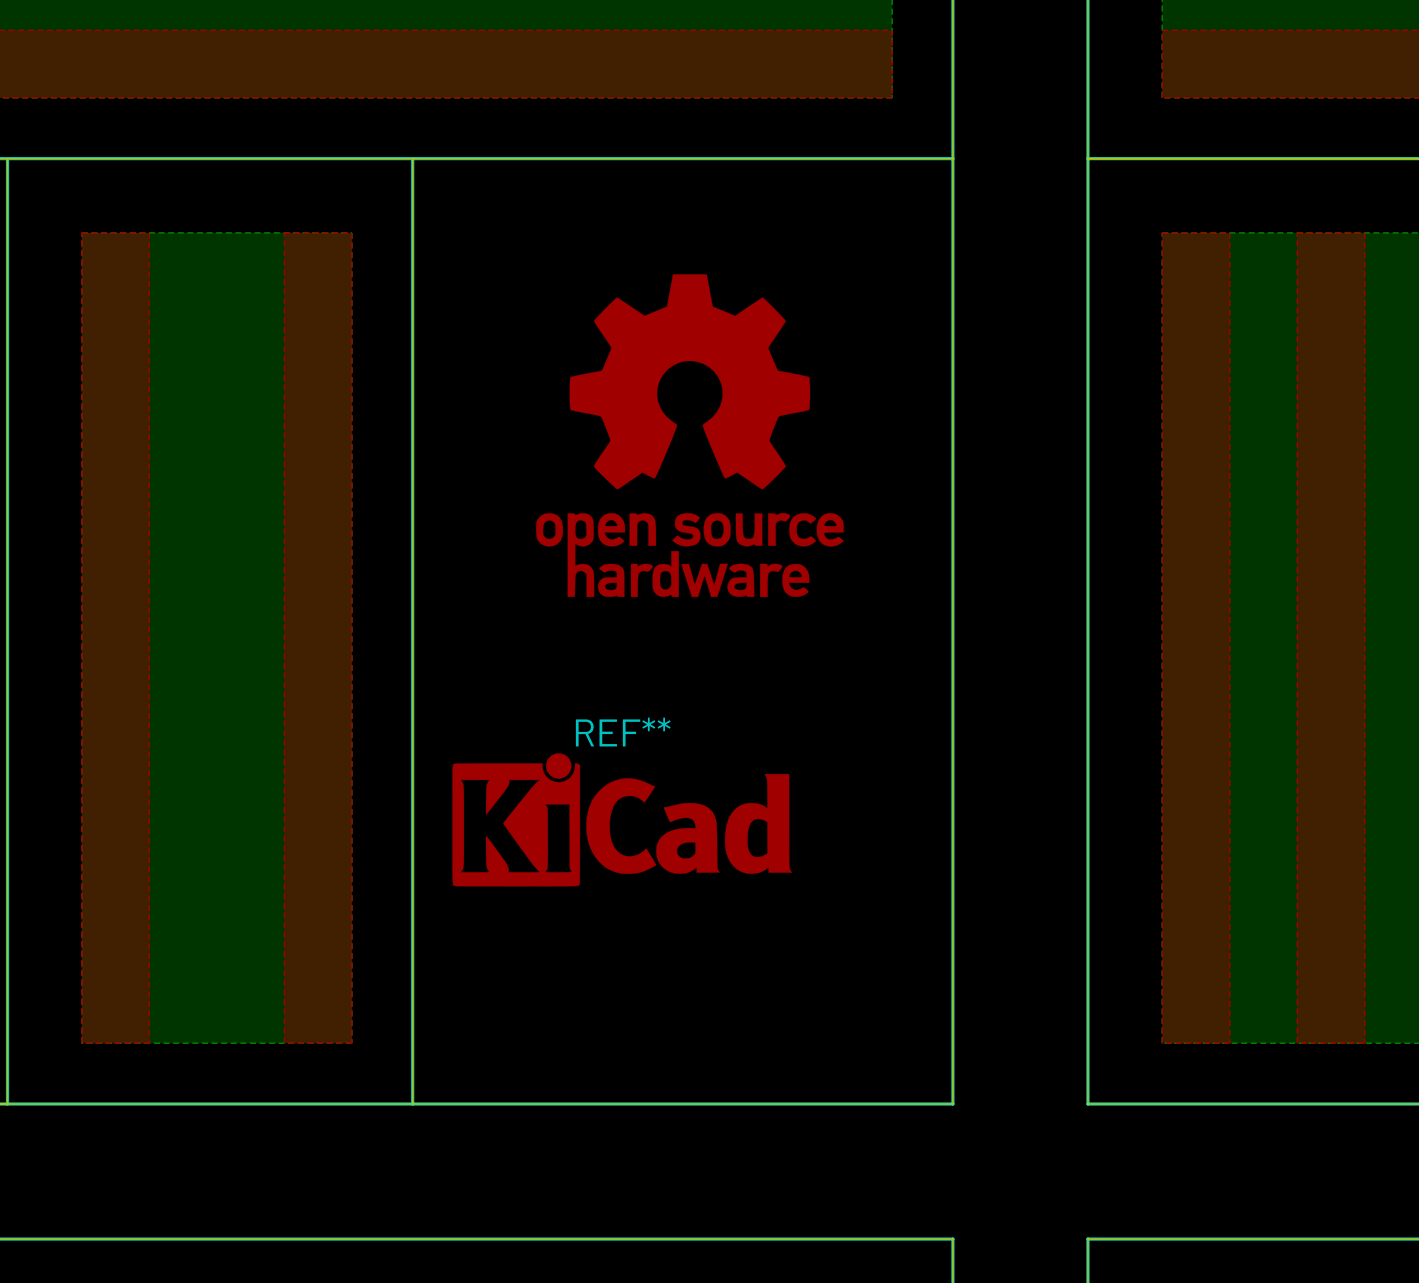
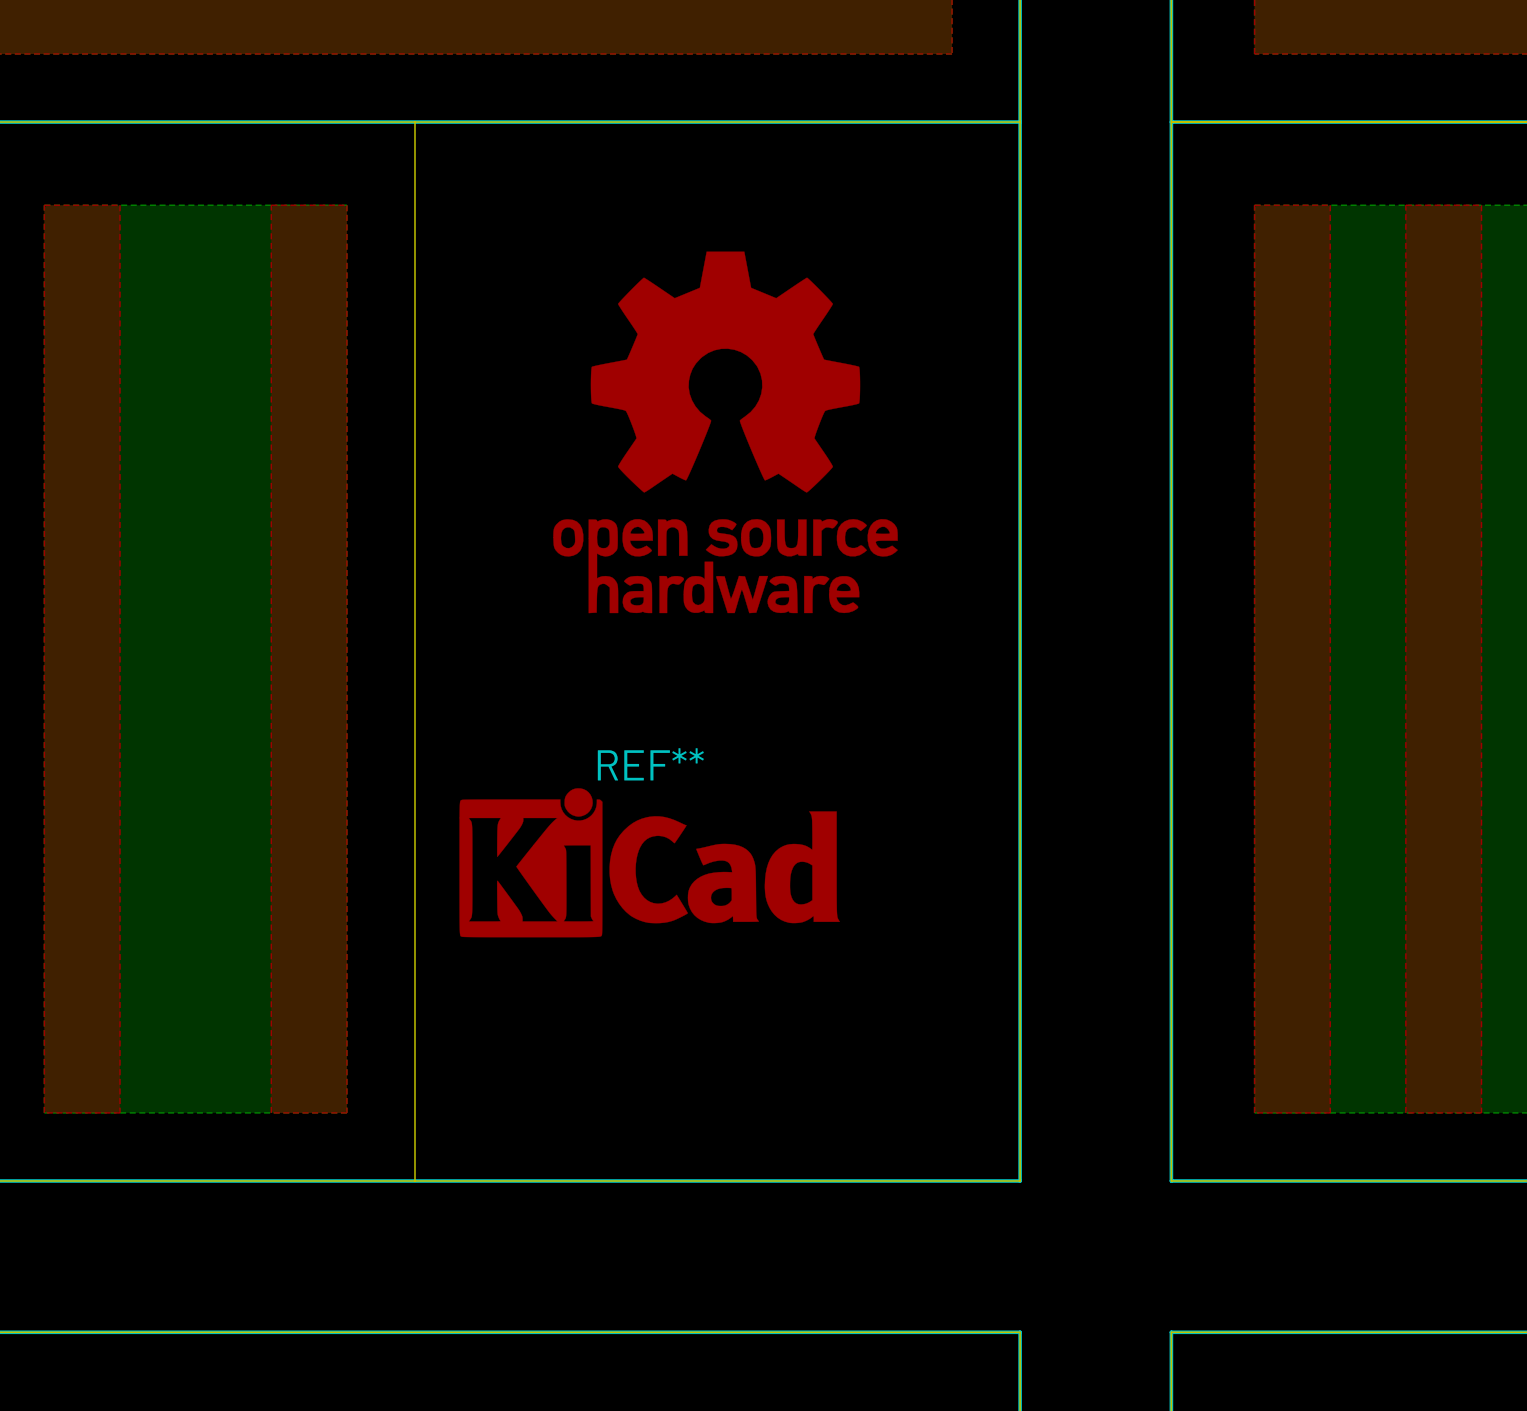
line: (412, 158) (412, 1104) -> none

